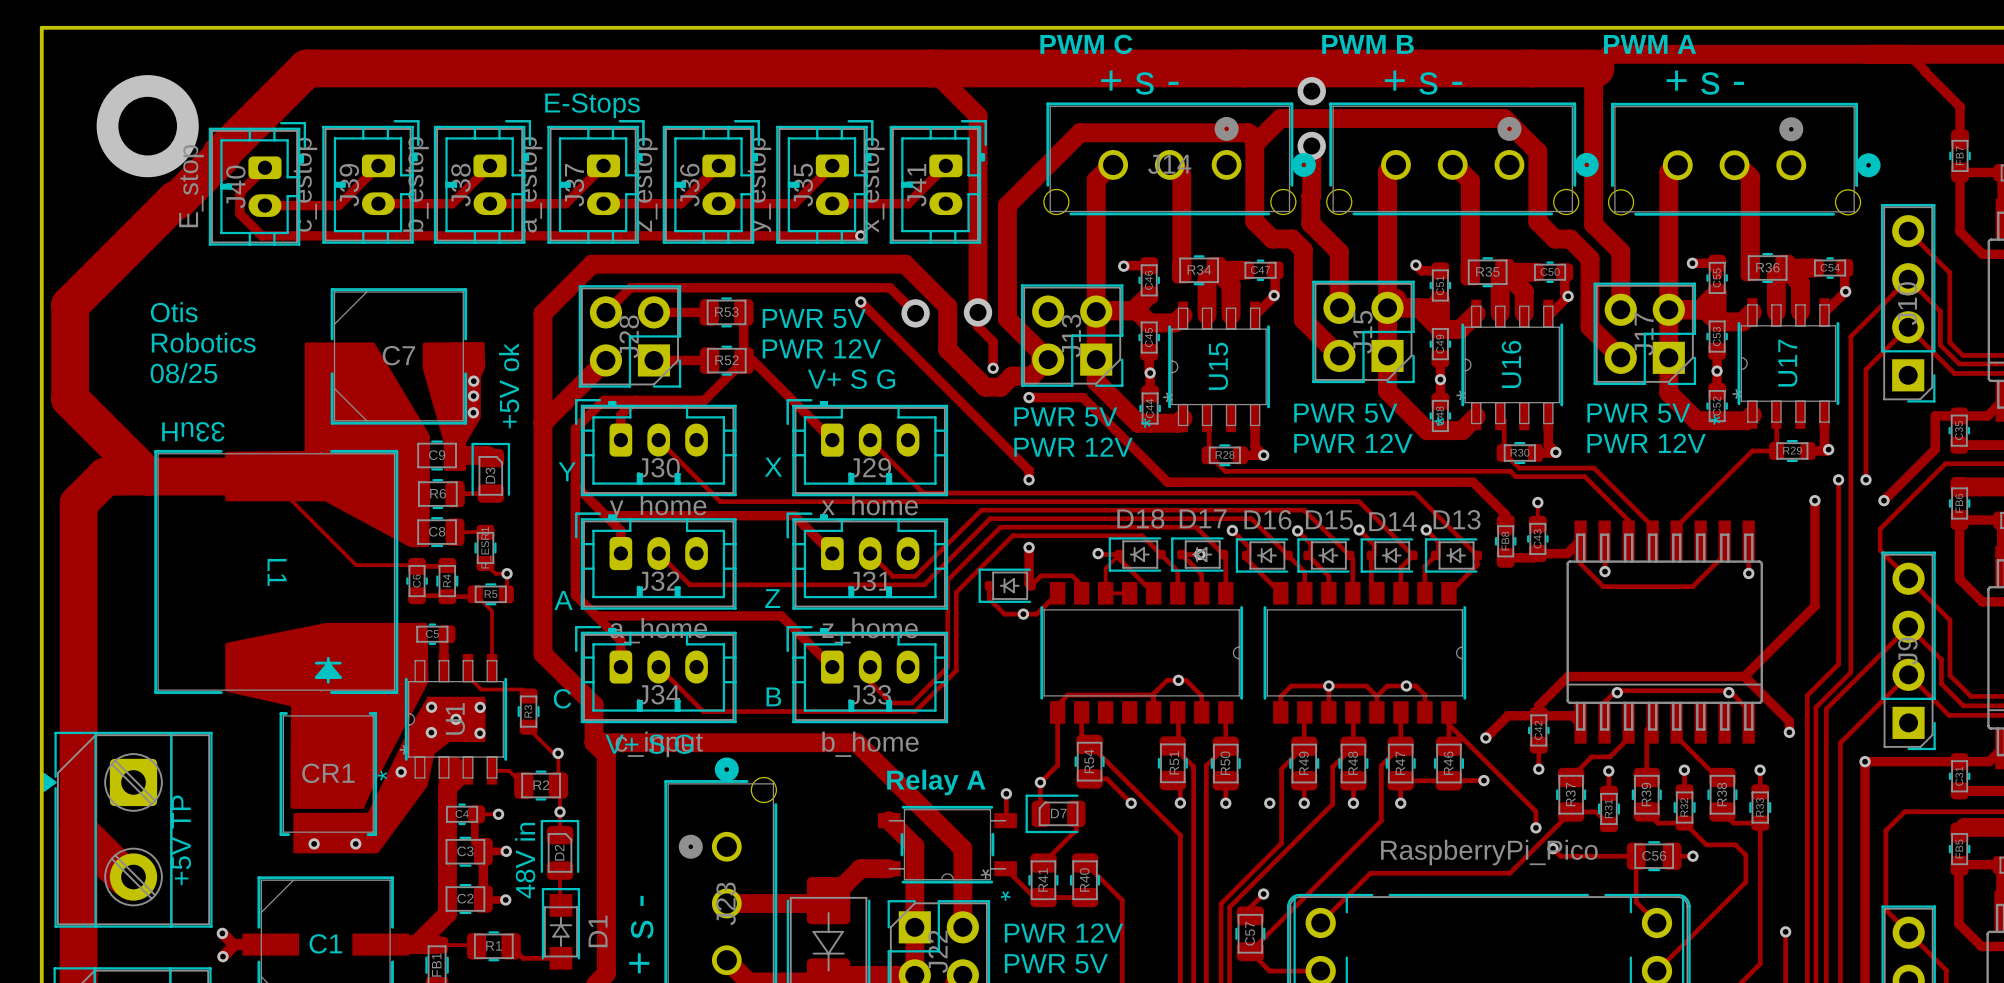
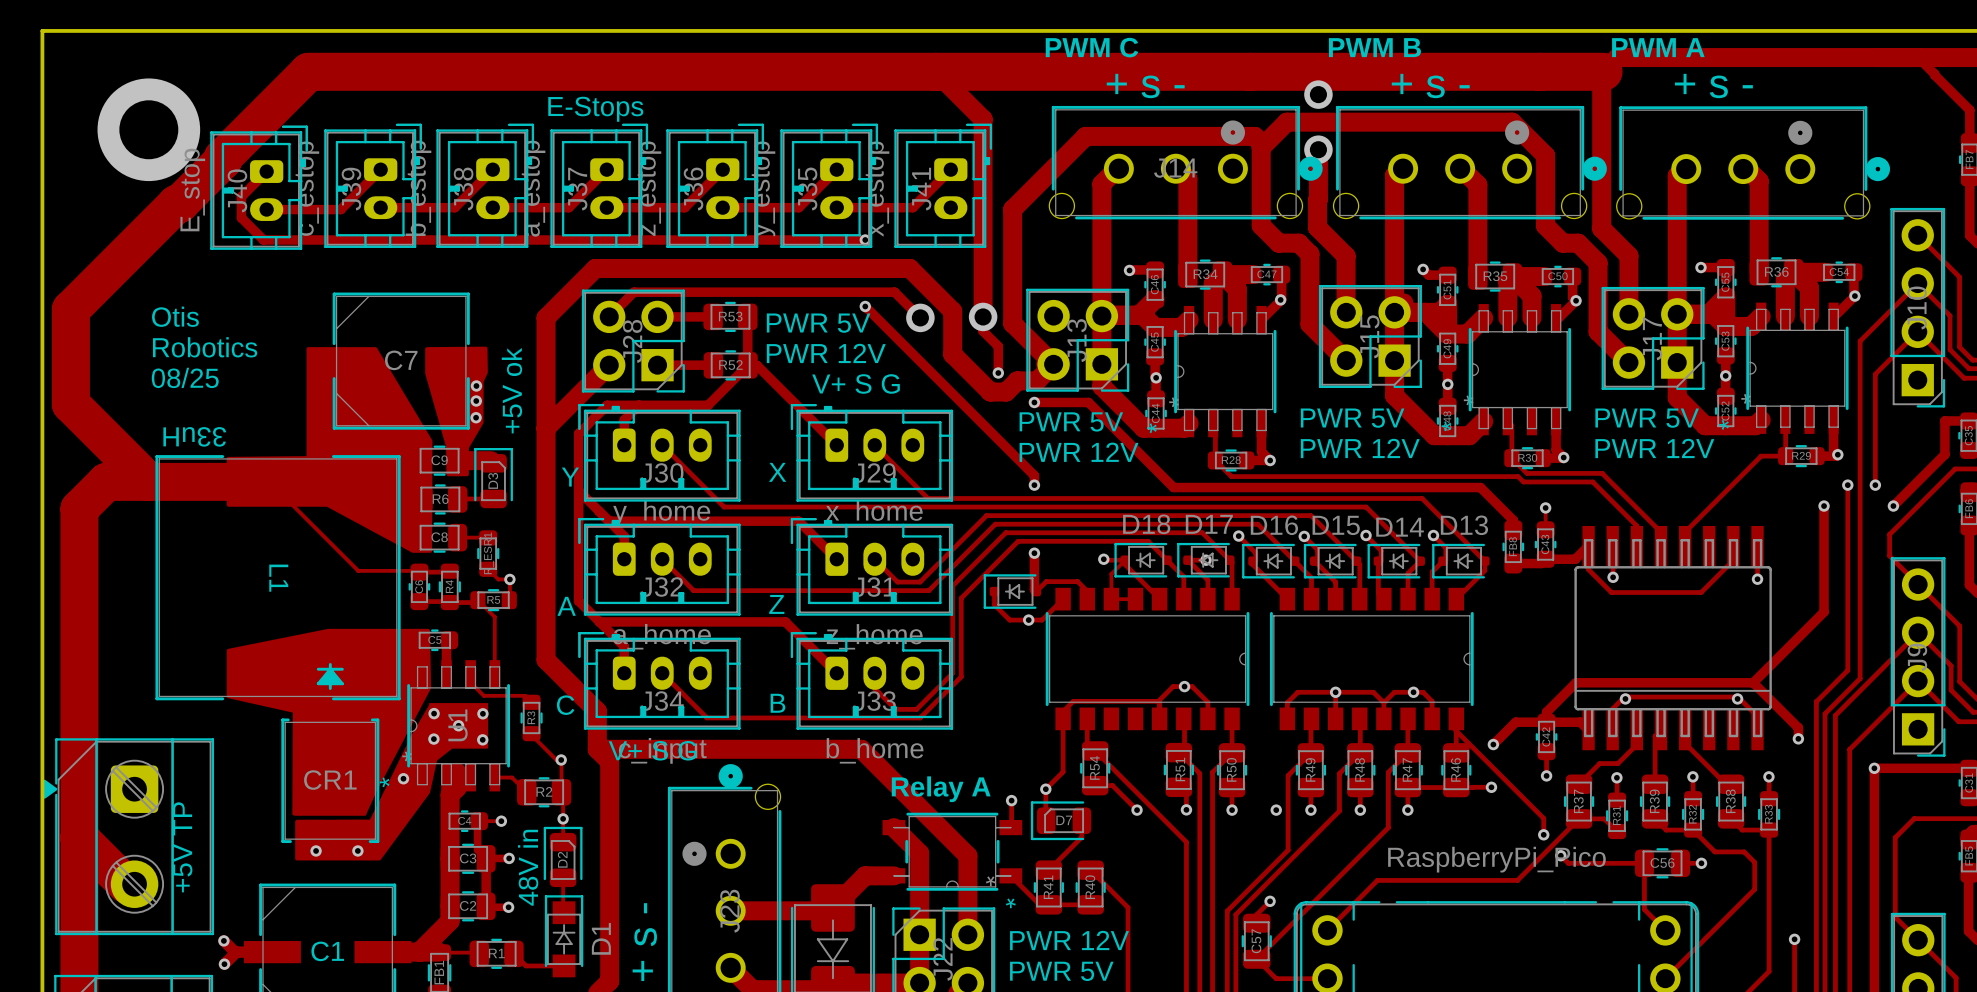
U17 name: U17 (1787, 363) -> none
U16 name: U16 (1511, 364) -> none
U15 name: U15 (1218, 366) -> none

